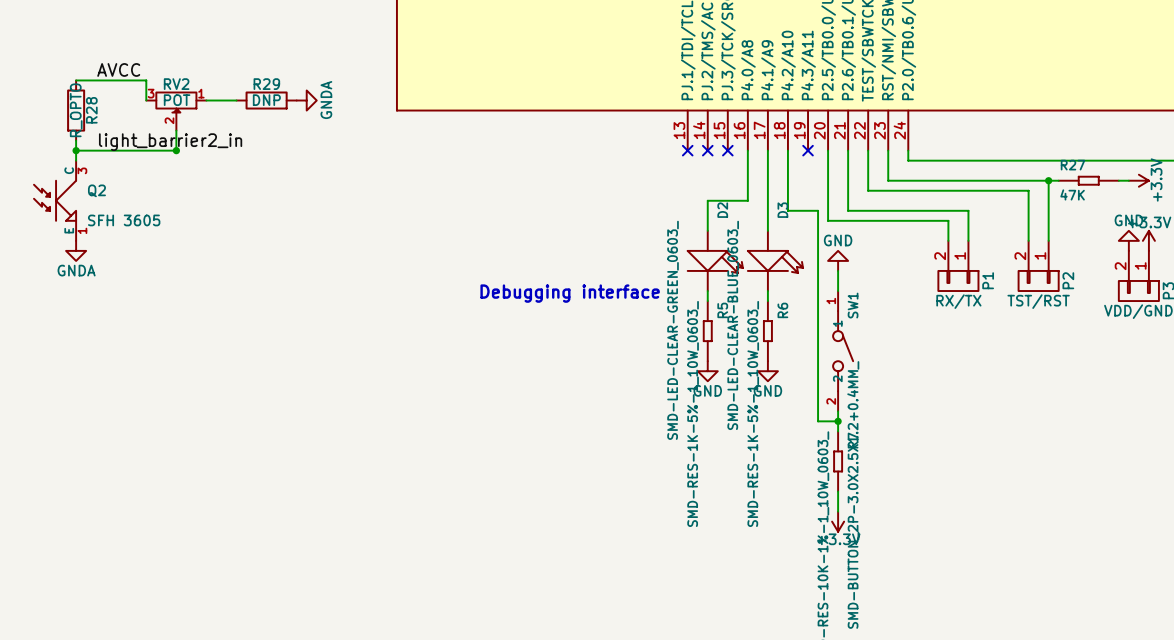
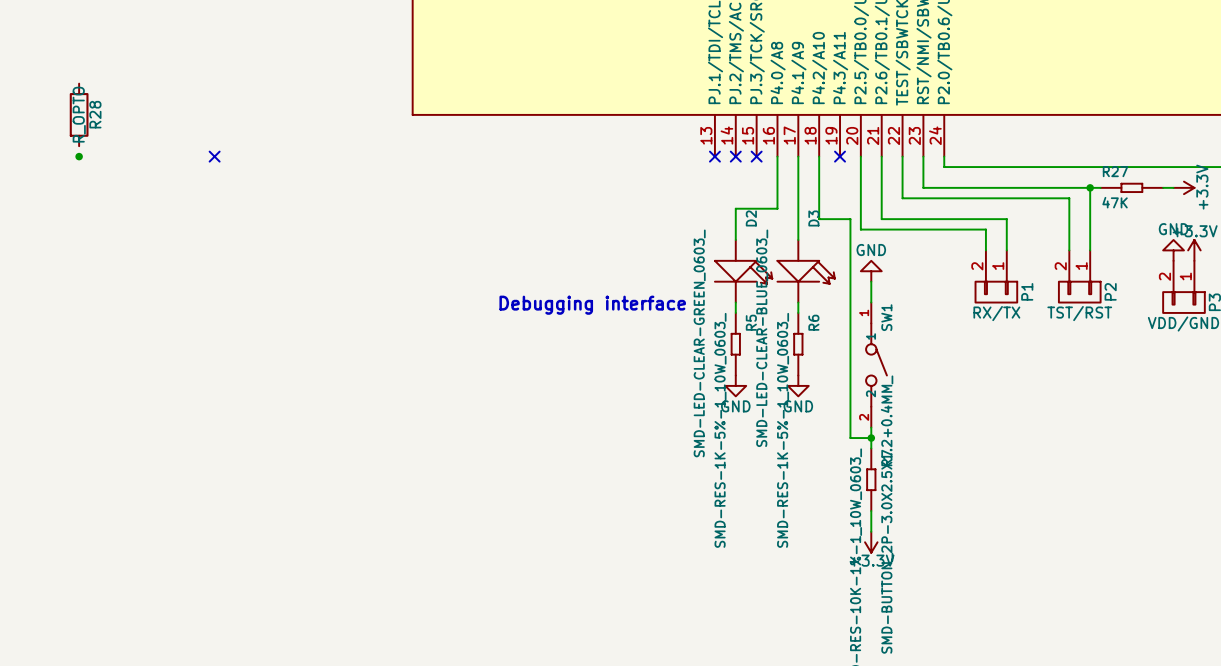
label: AVCC (118, 69) -> none
wire: (76, 80) (146, 80) (146, 100) -> none
wire: (206, 100) (236, 100) -> none
R29: DNP (266, 100) -> none
power symbol: GNDA (306, 100) -> none
RV2: POT (176, 111) -> none
wire: (176, 130) (176, 150) (76, 150) -> none
wire: (76, 140) (76, 160) -> none
label: light_barrier2_in (170, 142) -> none
junction: (176, 150) -> none
no-connect mark: none -> (214, 156)
Q2: SFH 3605 (55, 200) -> none
power symbol: GNDA (76, 250) -> none

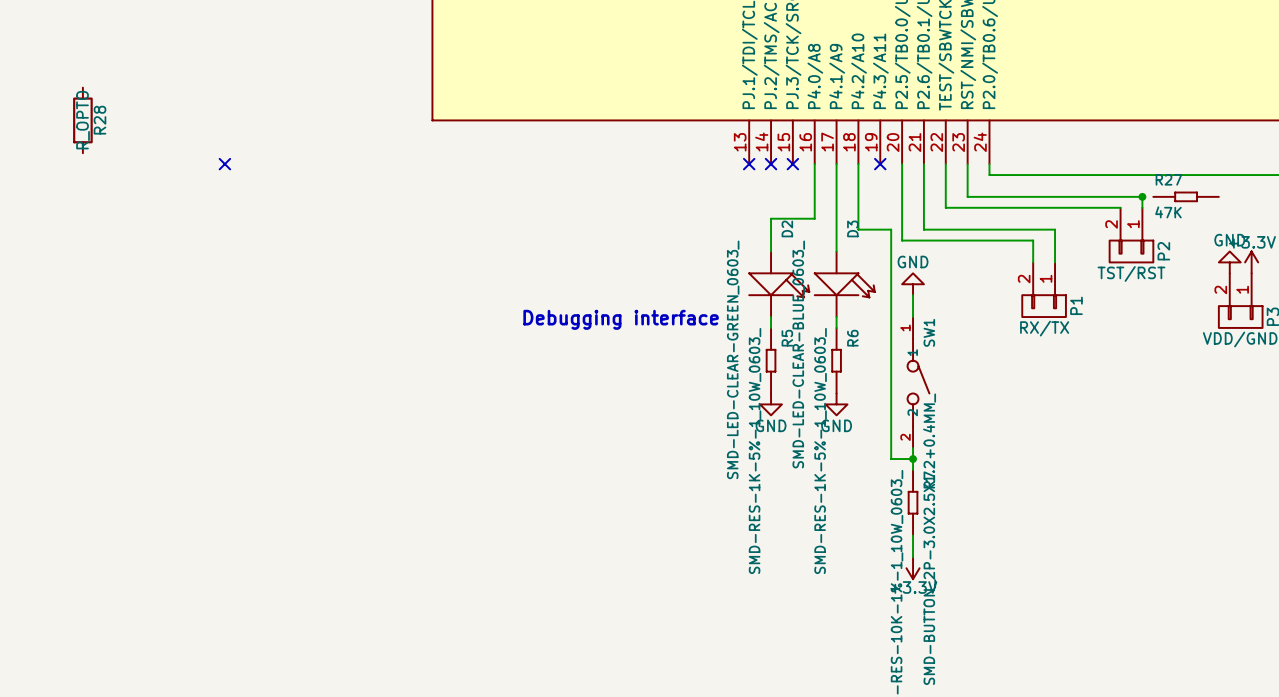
junction: (79, 156) -> none
wire: (1090, 187) (1100, 187) -> none
wire: (1163, 187) (1173, 187) -> none
power symbol: +3.3V (1183, 187) -> none
P2 position: (1079, 276) -> (1131, 235)

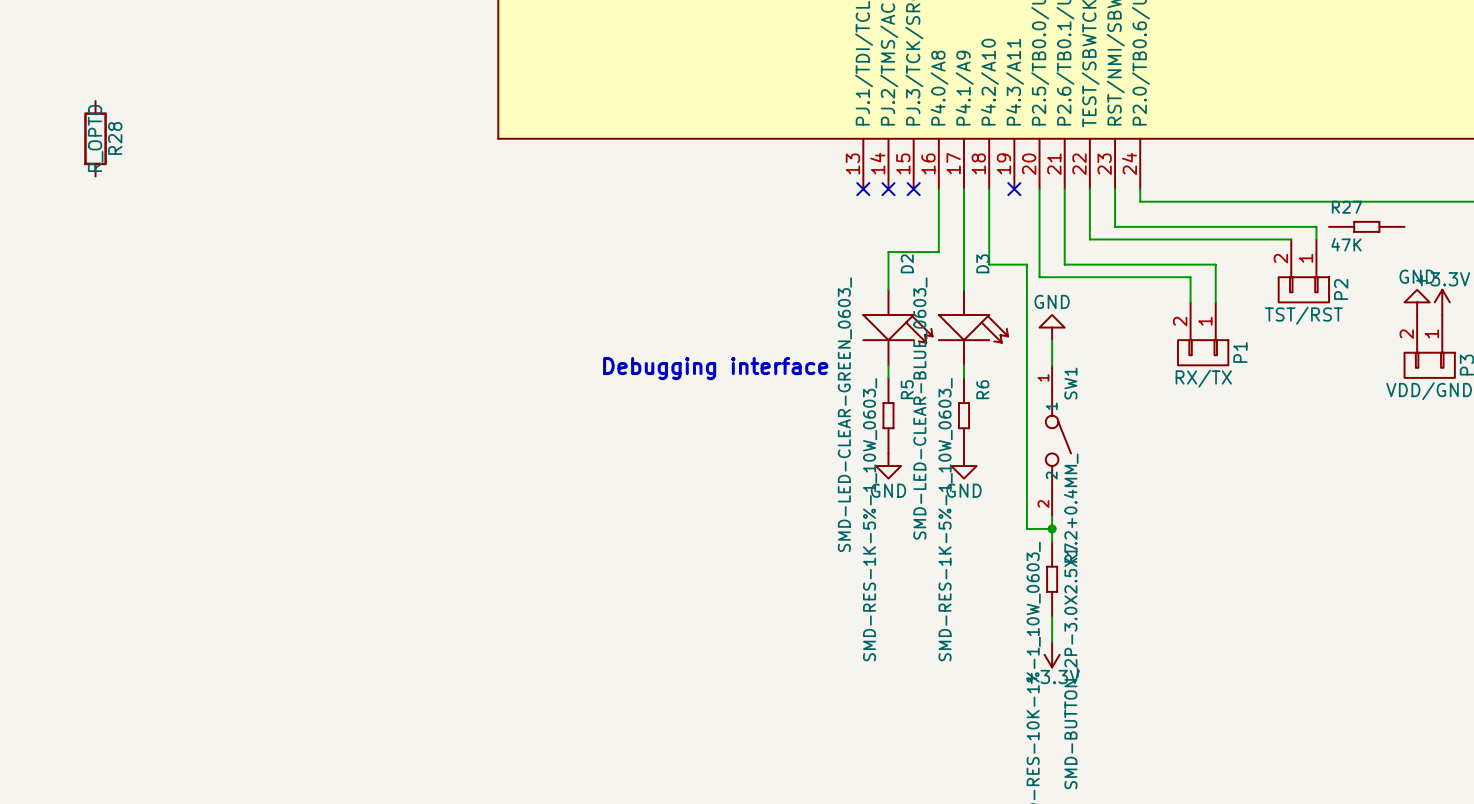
no-connect mark: (224, 164) -> none
junction: (1142, 196) -> none

